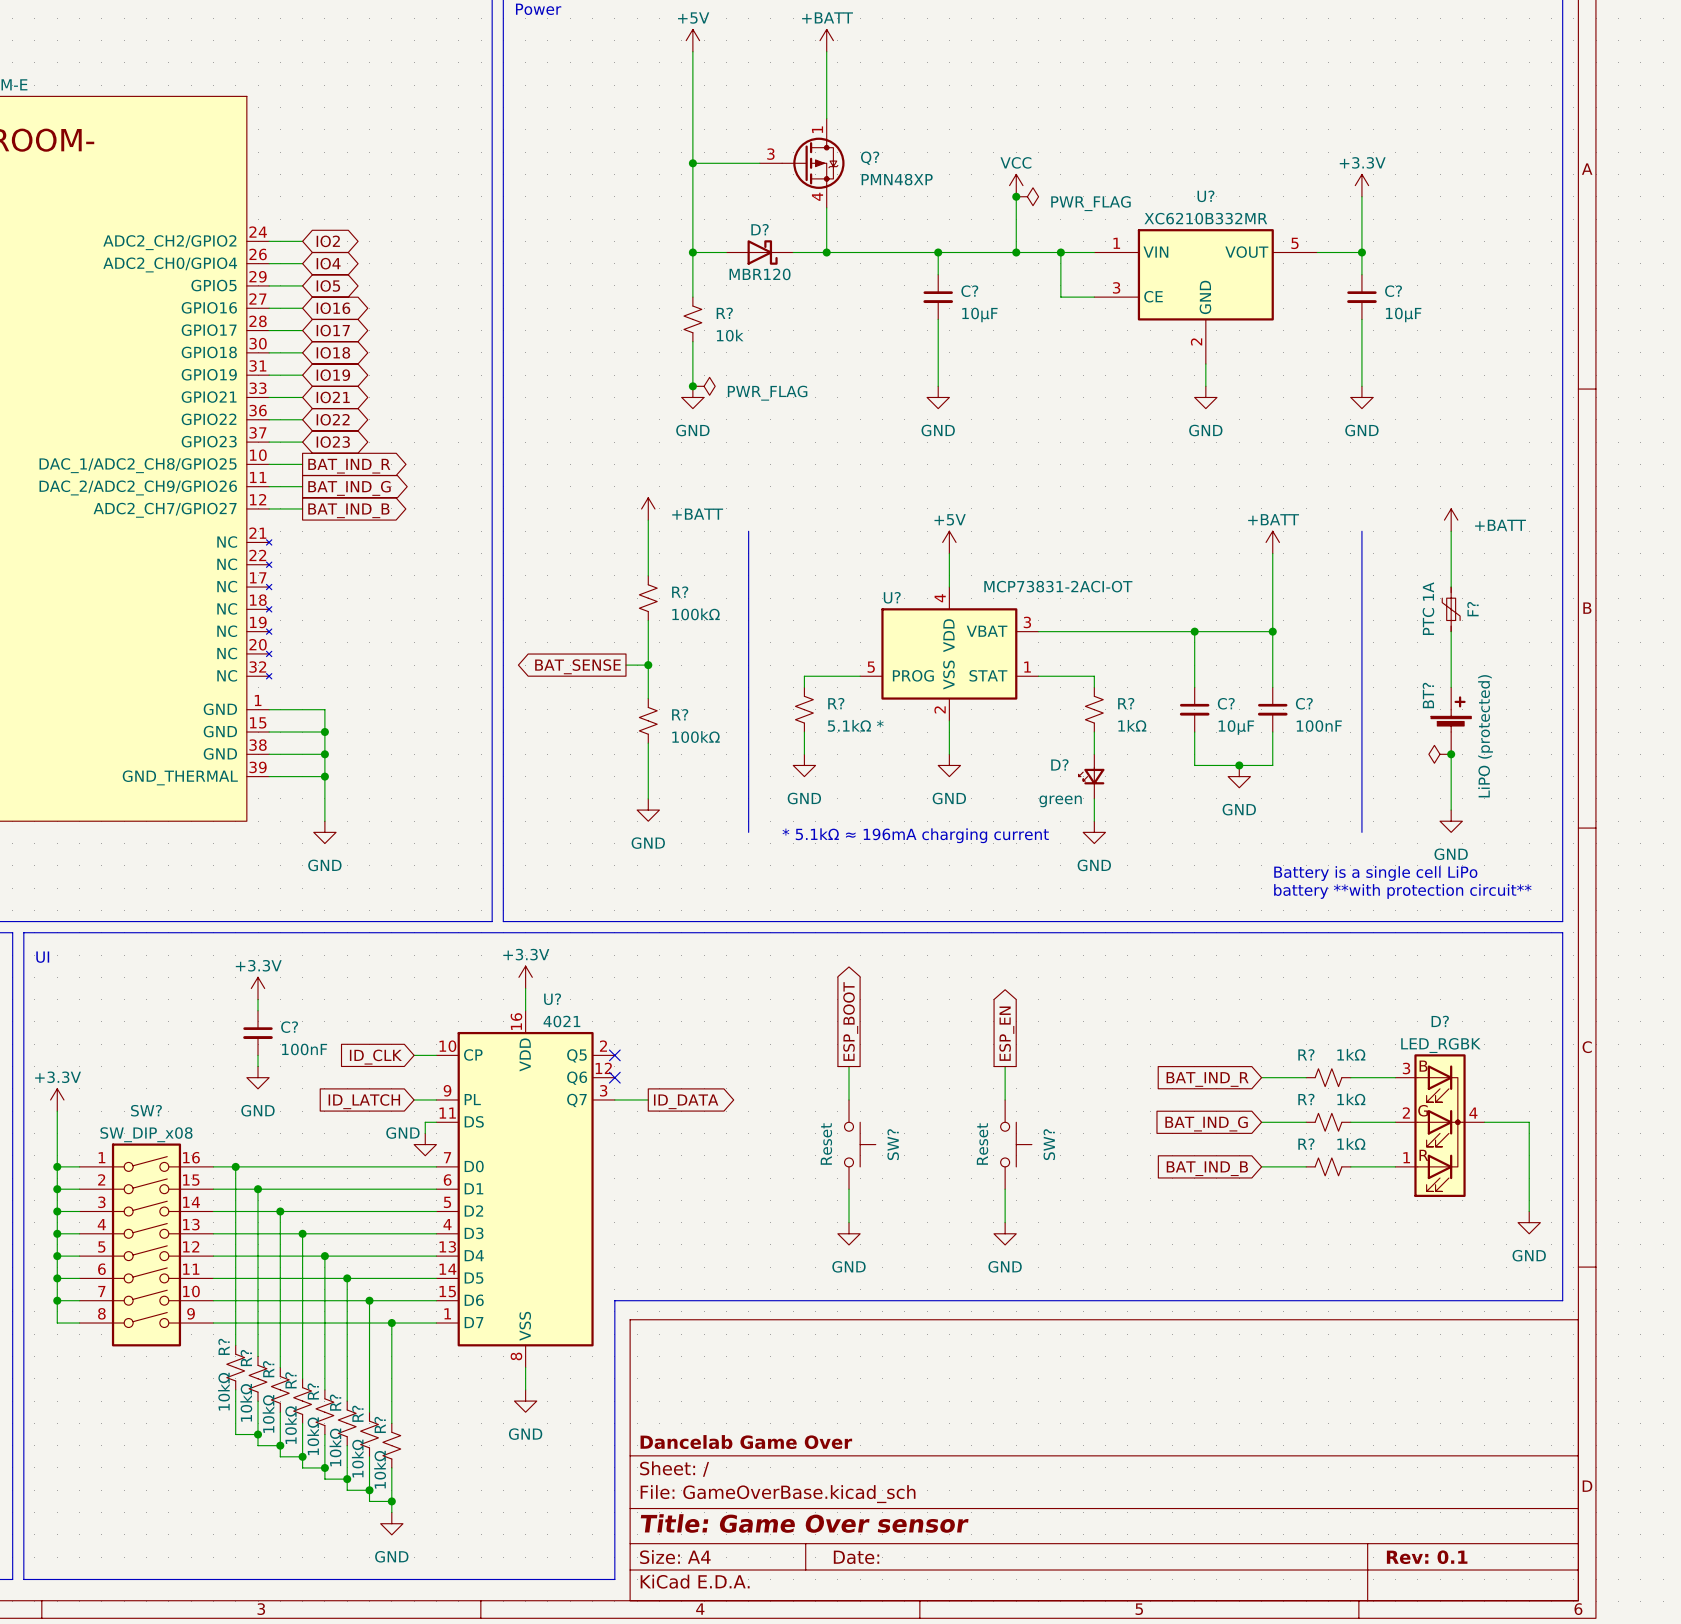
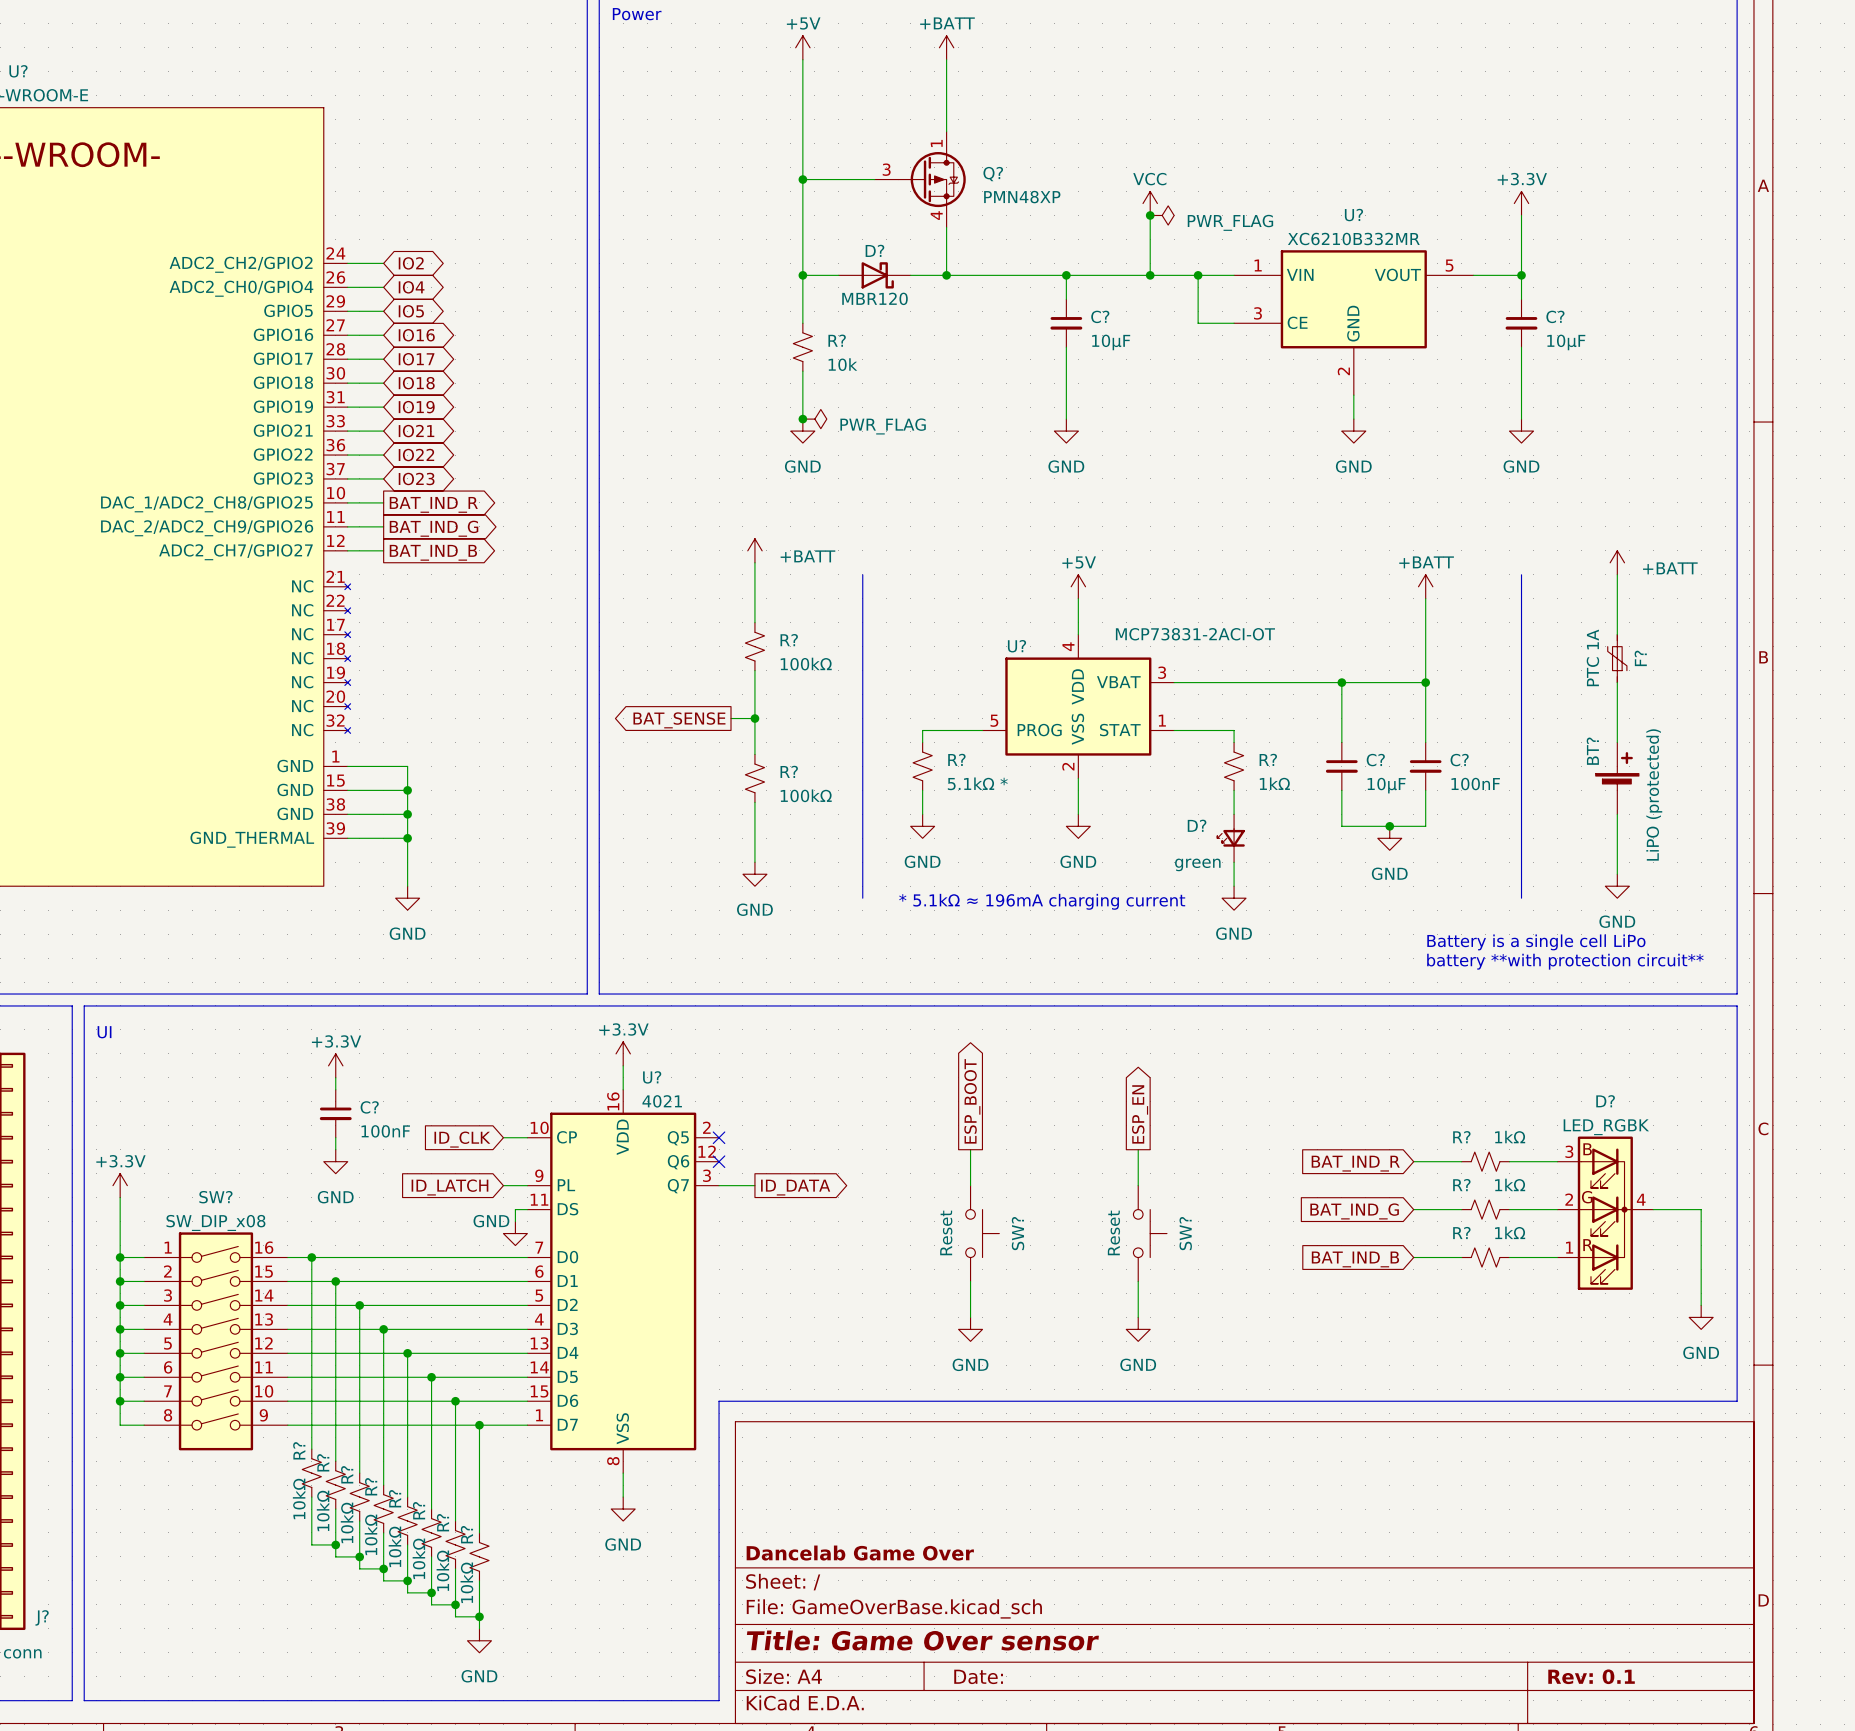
power symbol: (1440, 754) -> none
junction: (1451, 754) -> none

